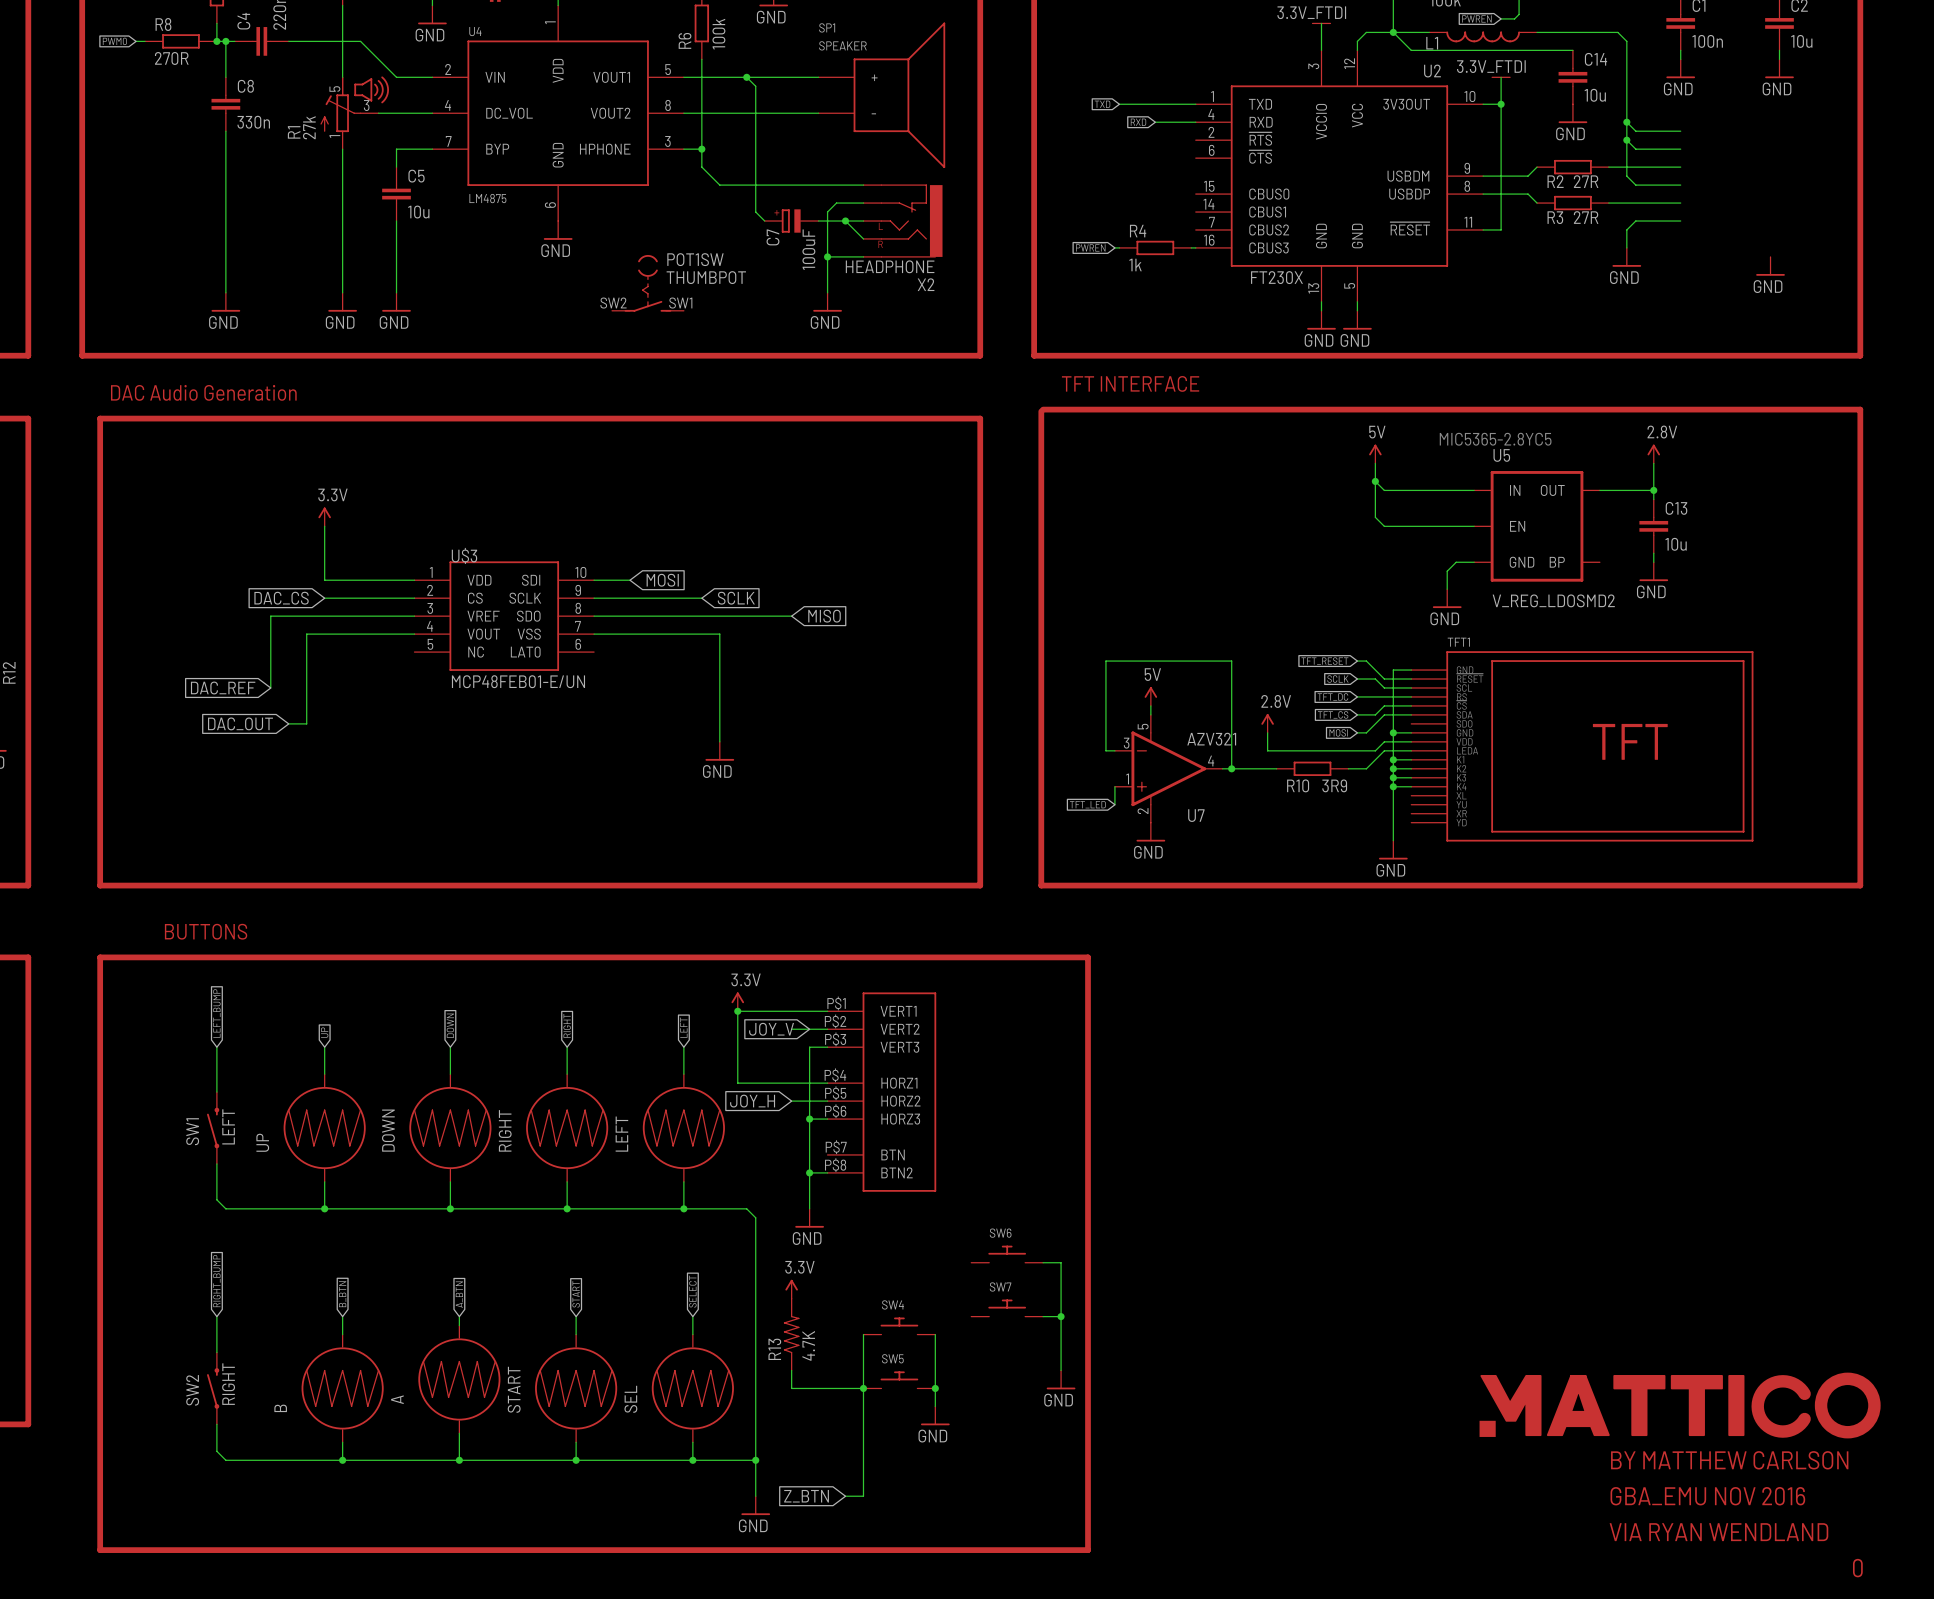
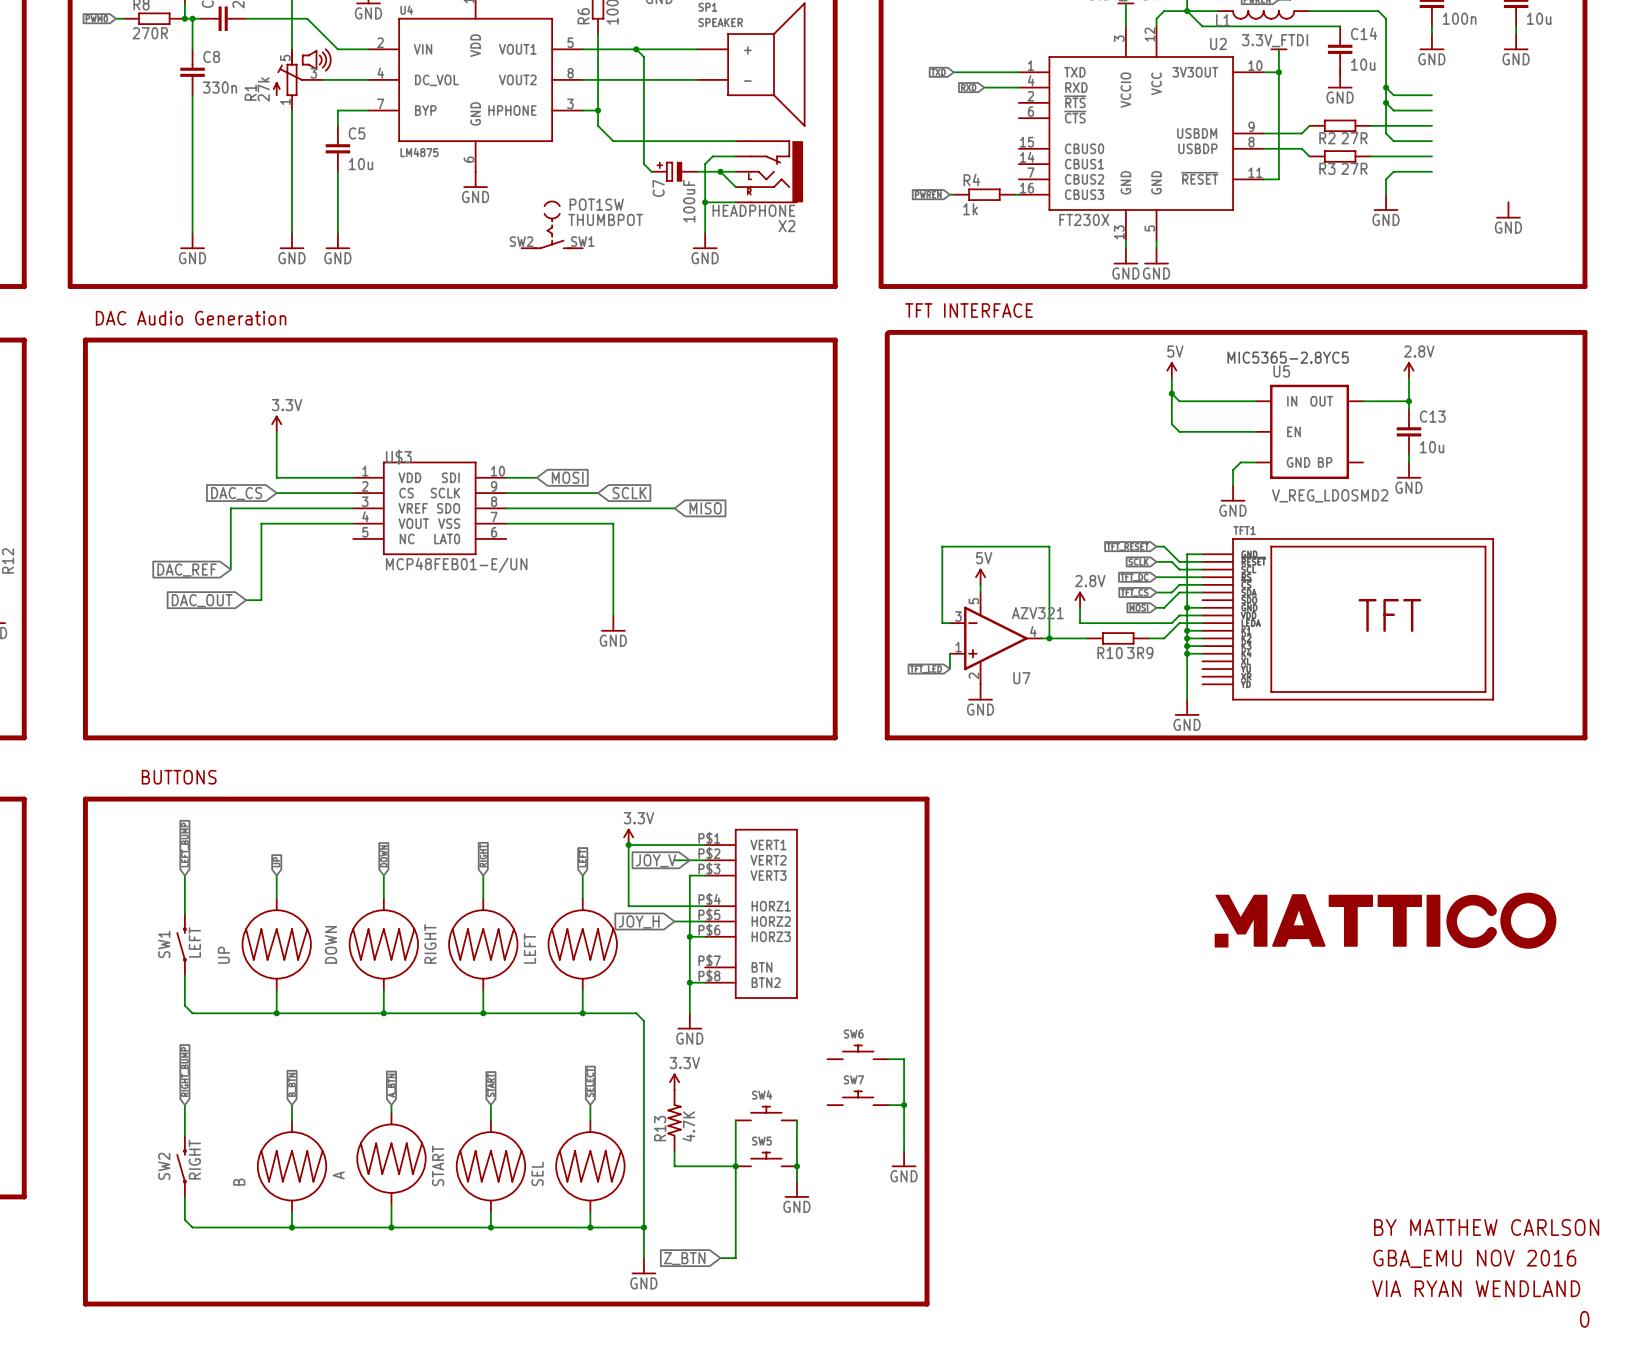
part: none -> (1385, 920)
part: (1680, 1405) -> none

